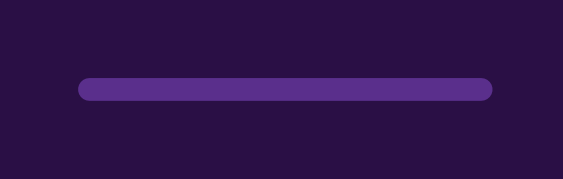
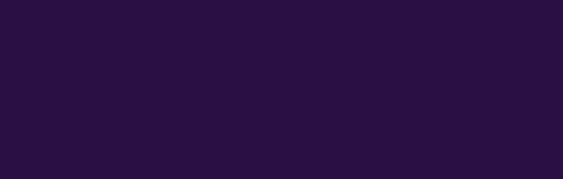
track: (89, 89) (481, 89) -> none

